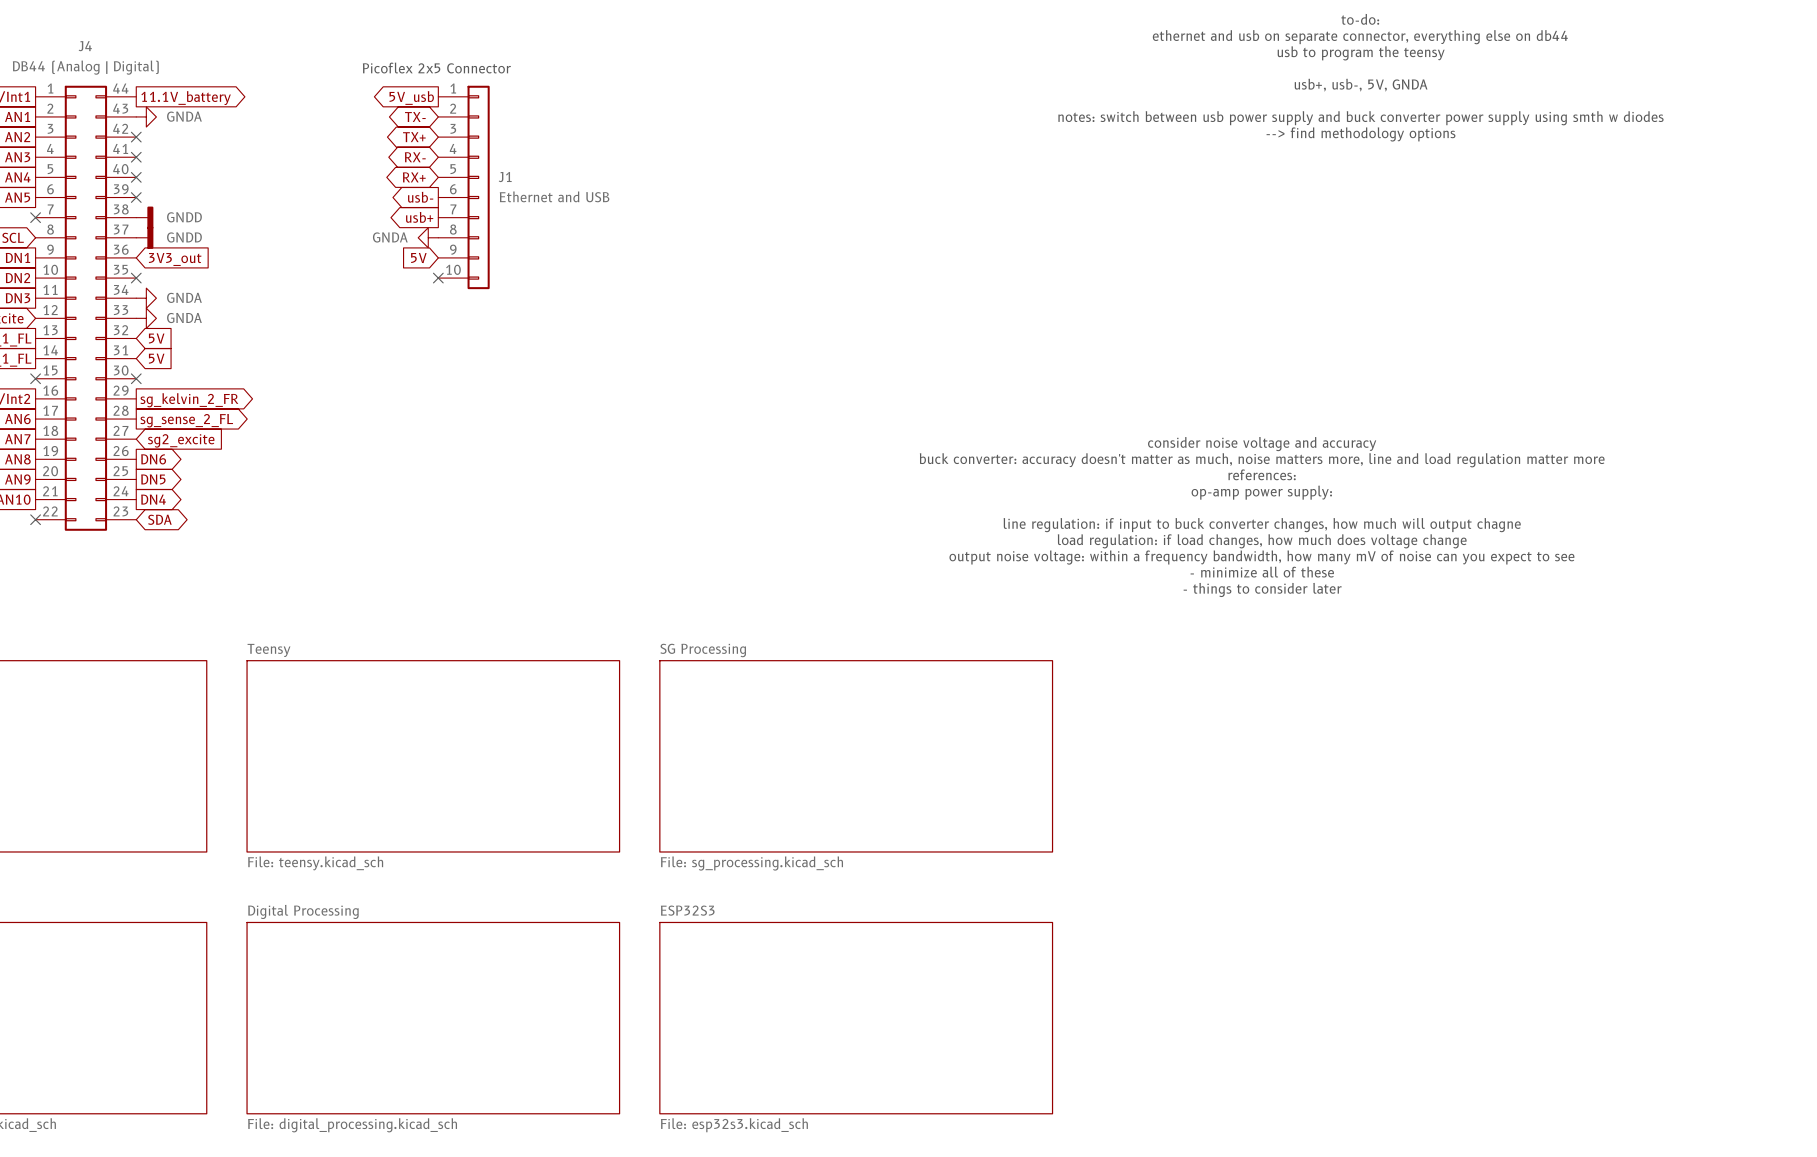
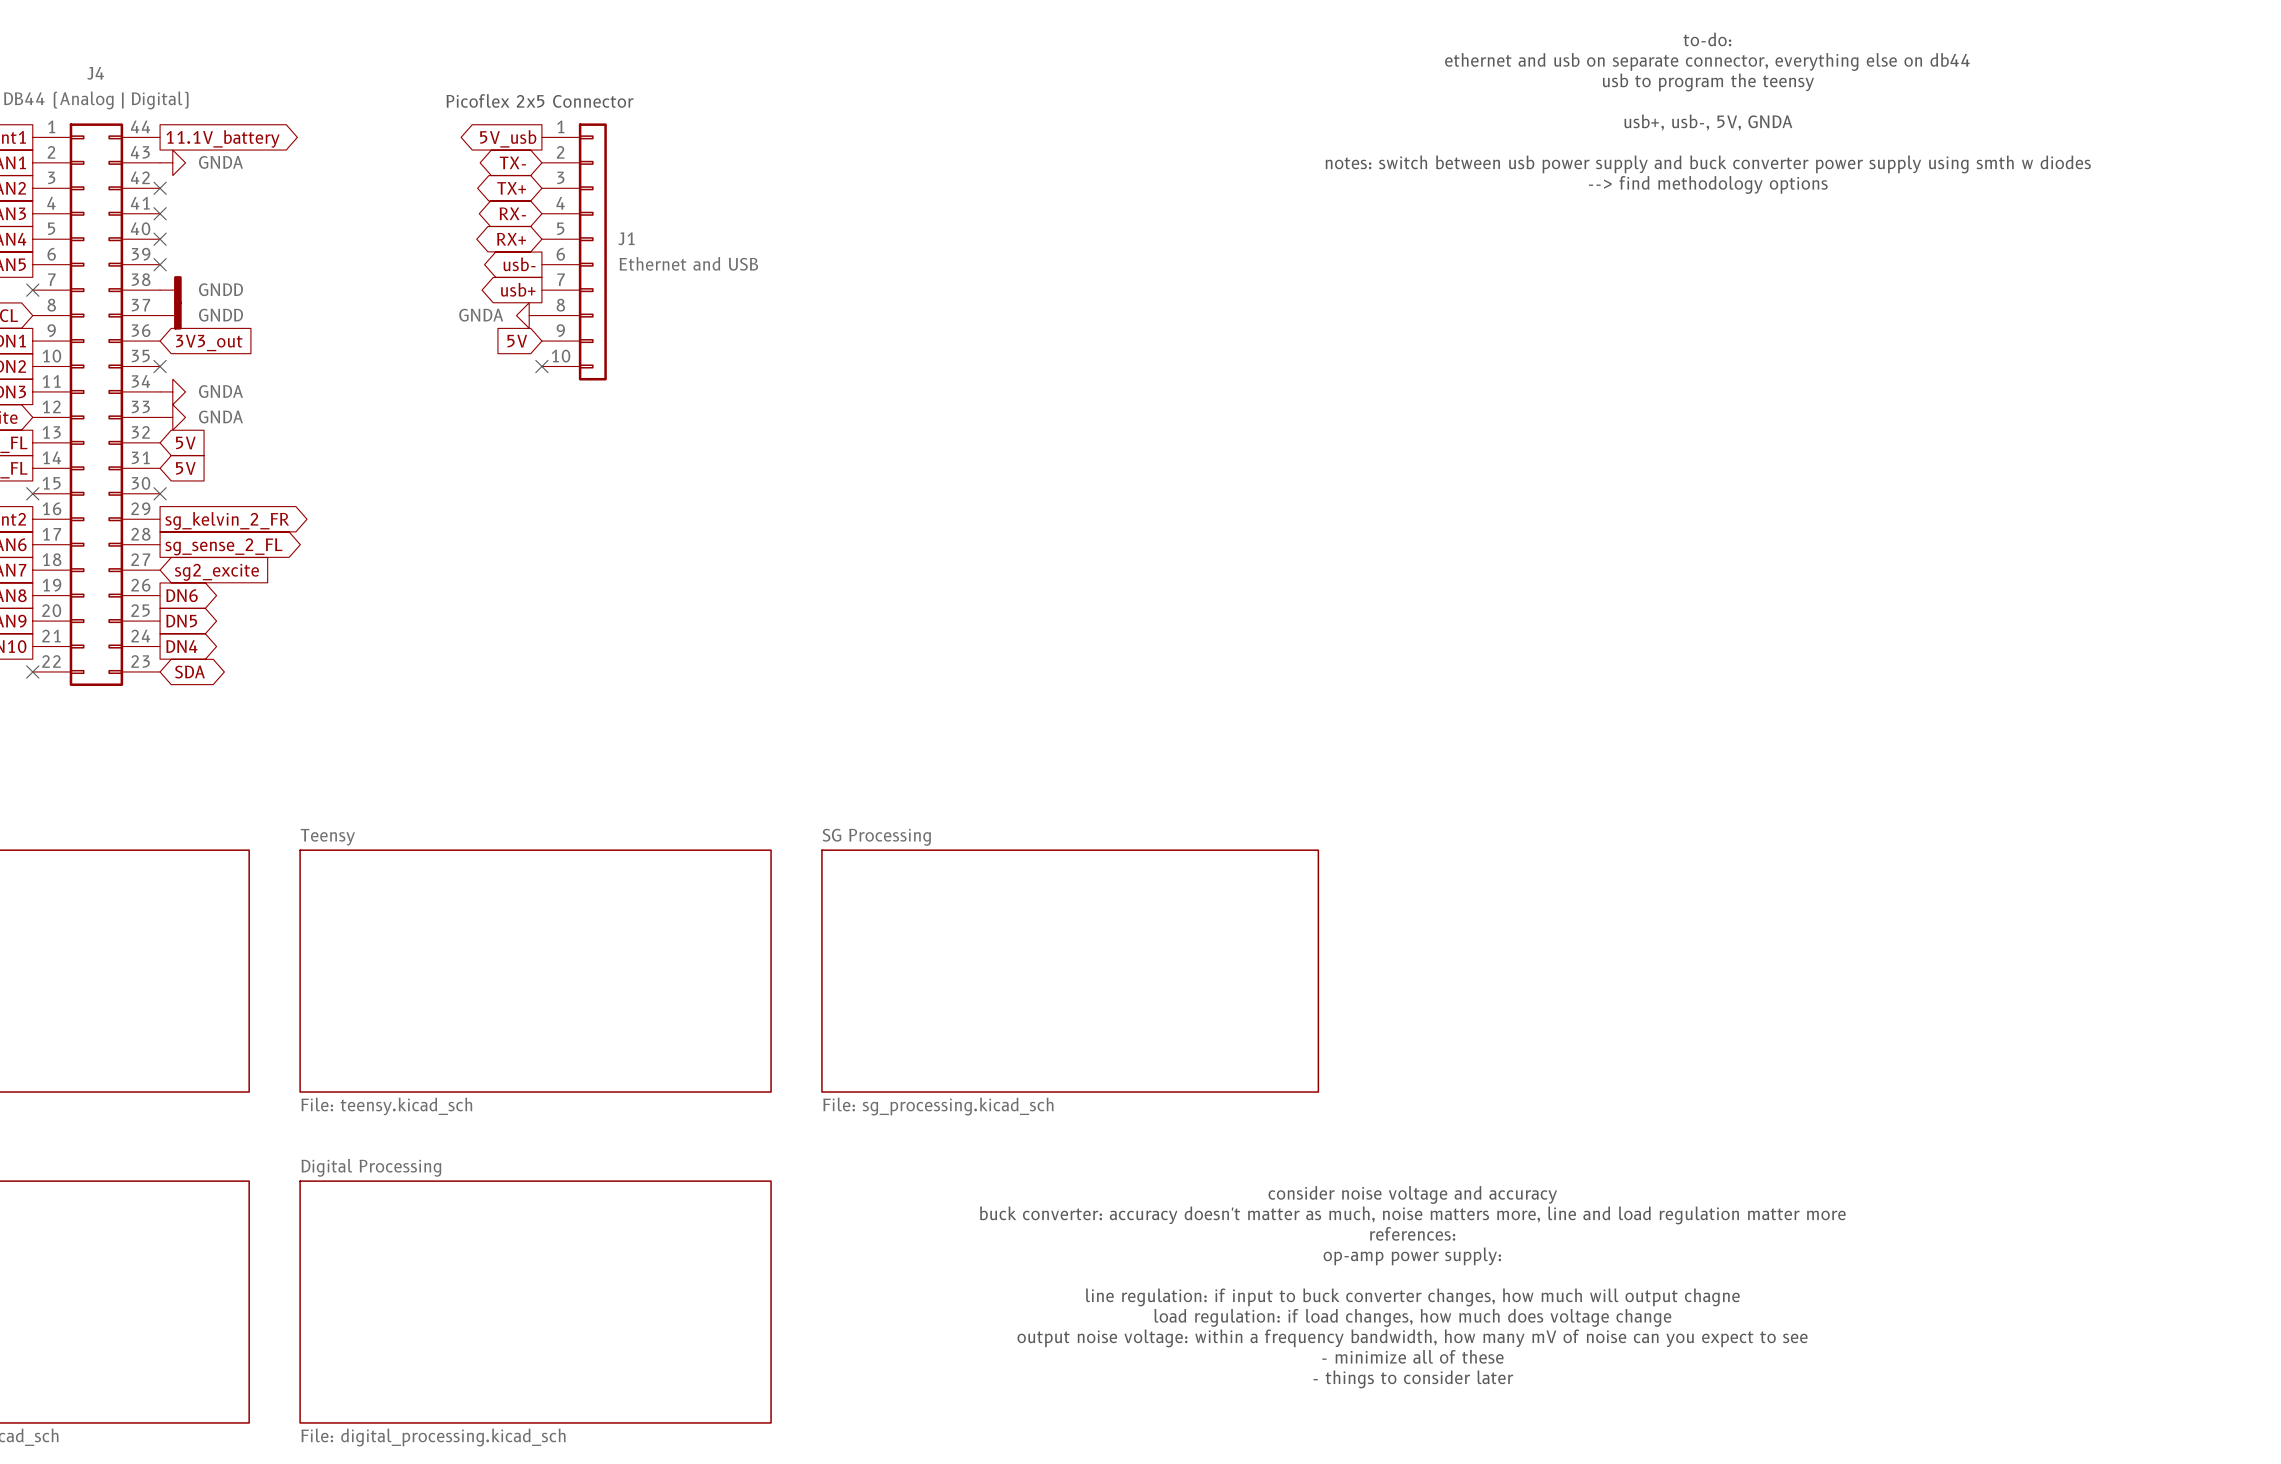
text: consider noise voltage and accuracy (1262, 444) -> none
text: buck converter: accuracy doesn't matter as much, noise matters more, line and load regulation matter more (1262, 460) -> none
text: references: (1262, 474) -> none
text: op-amp power supply: (1261, 492) -> none
text: line regulation: if input to buck converter changes, how much will output chagne (1262, 525) -> none
text: load regulation: if load changes, how much does voltage change (1262, 541) -> none
text: output noise voltage: within a frequency bandwidth, how many mV of noise can you expect to see (1261, 557) -> none
text: - minimize all of these (1262, 572) -> none
text: - things to consider later (1262, 589) -> none
text: none -> consider noise voltage and accuracy (1412, 1194)
text: none -> buck converter: accuracy doesn't matter as much, noise matters more, line and load regulation matter more (1412, 1215)
text: none -> references: (1412, 1233)
text: none -> op-amp power supply: (1412, 1256)
text: none -> line regulation: if input to buck converter changes, how much will output chagne (1412, 1297)
sheet ESP32S3: File: esp32s3.kicad_sch (856, 1018) -> none
text: none -> load regulation: if load changes, how much does voltage change (1412, 1317)
text: none -> output noise voltage: within a frequency bandwidth, how many mV of noise can you expect to see (1412, 1338)
text: none -> - minimize all of these (1412, 1356)
text: none -> - things to consider later (1413, 1379)

